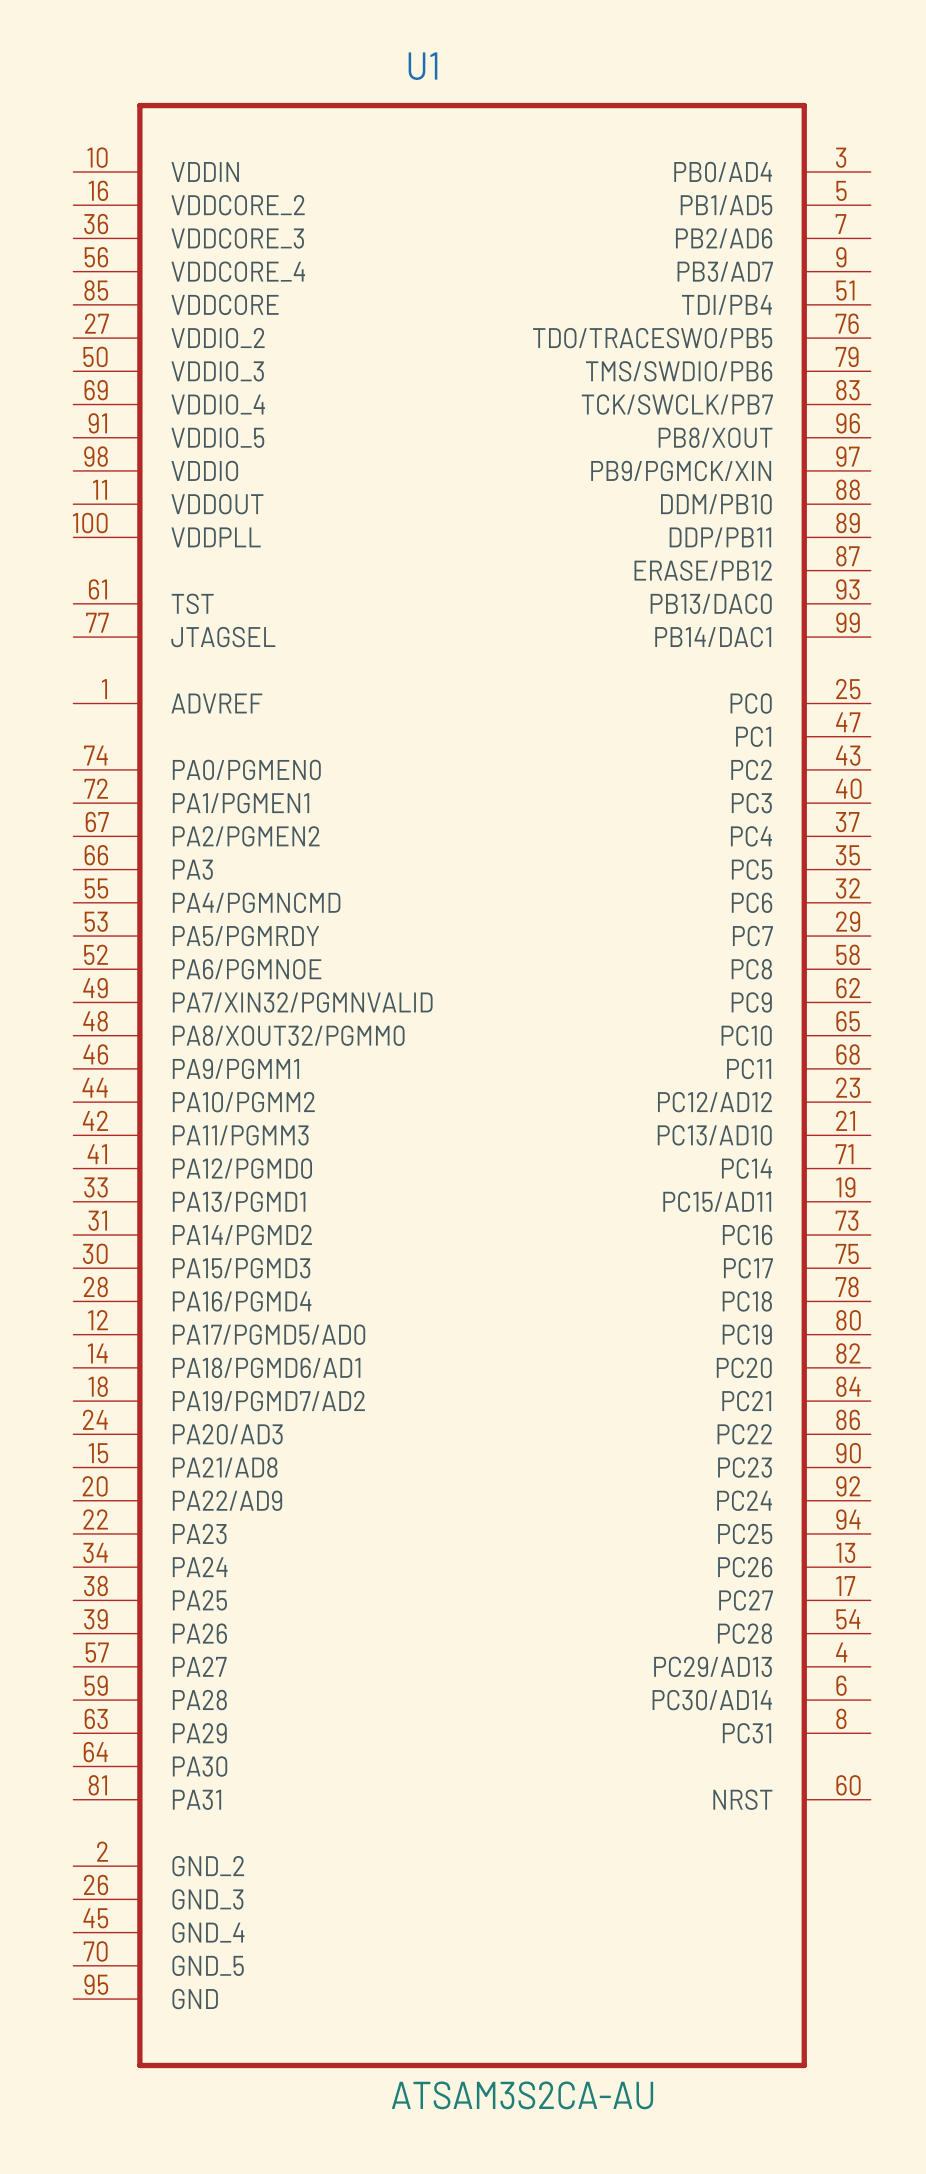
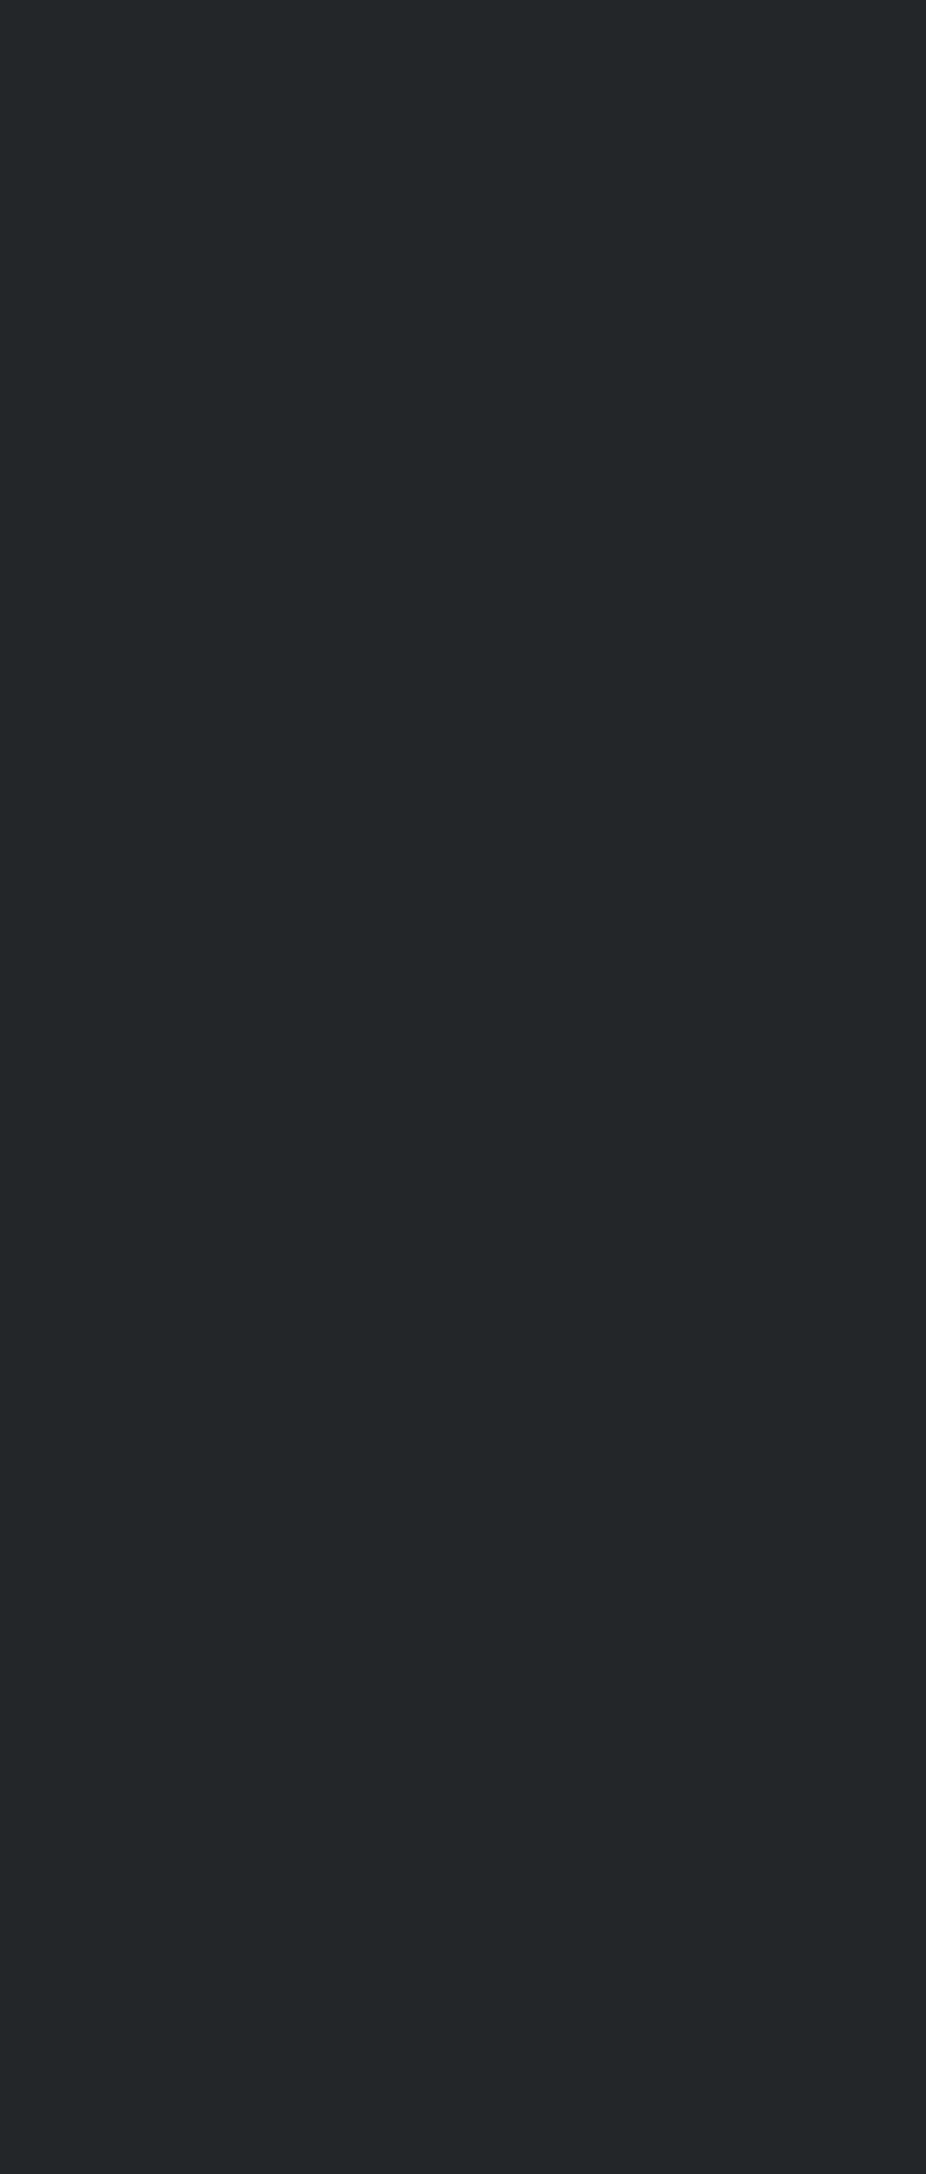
U1: ATSAM3S2CA-AU (472, 1085) -> none

